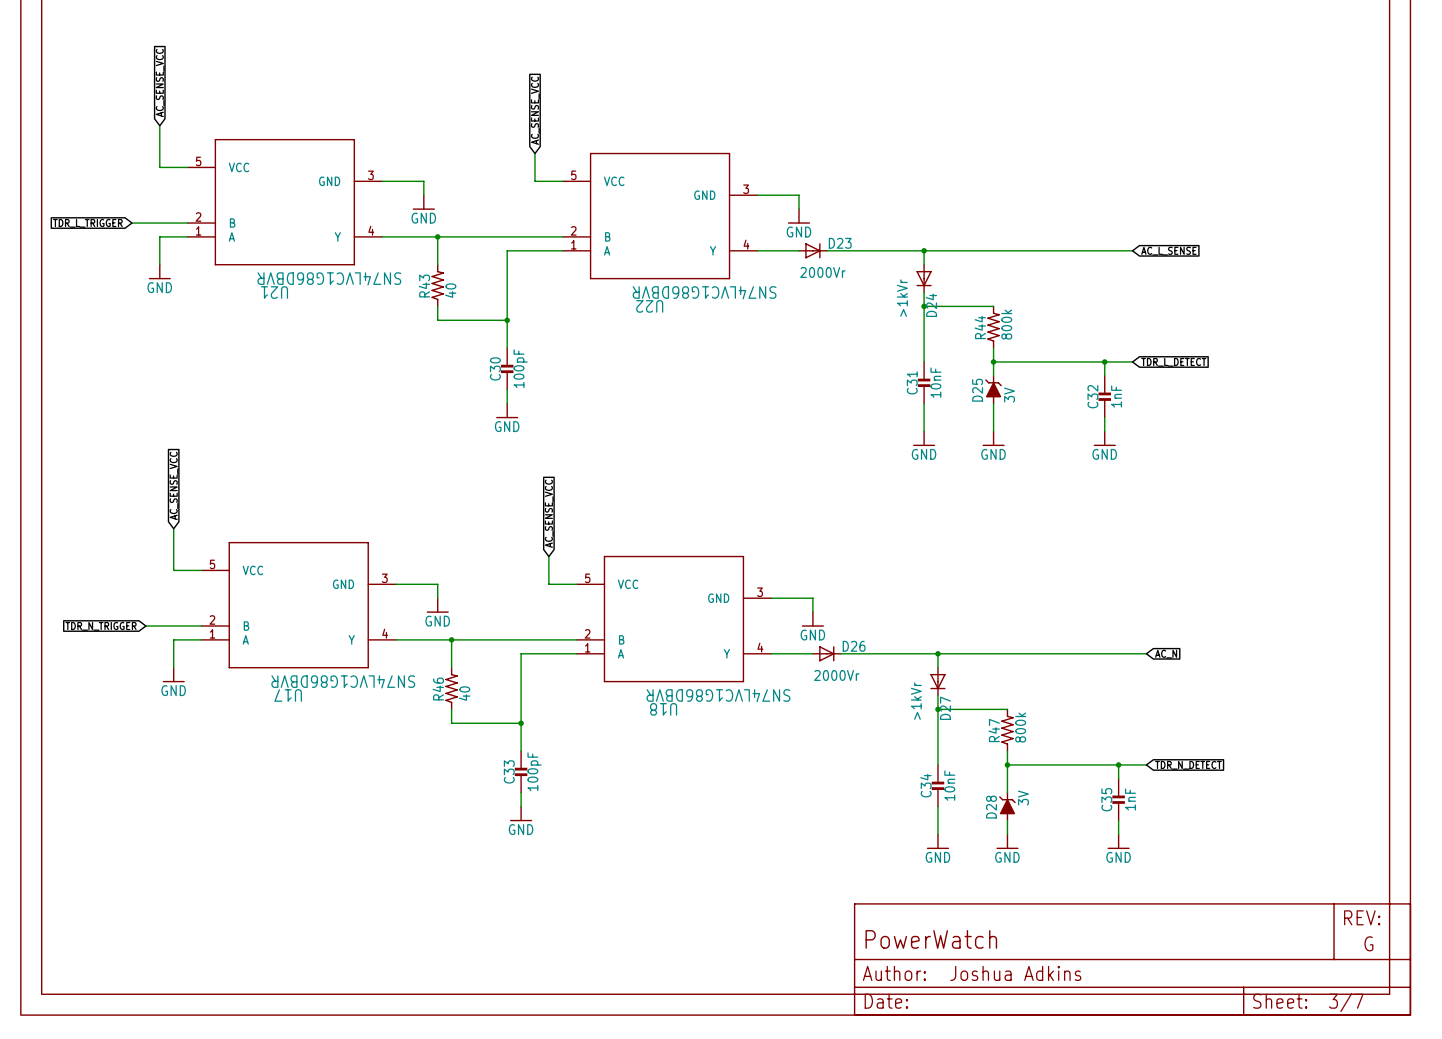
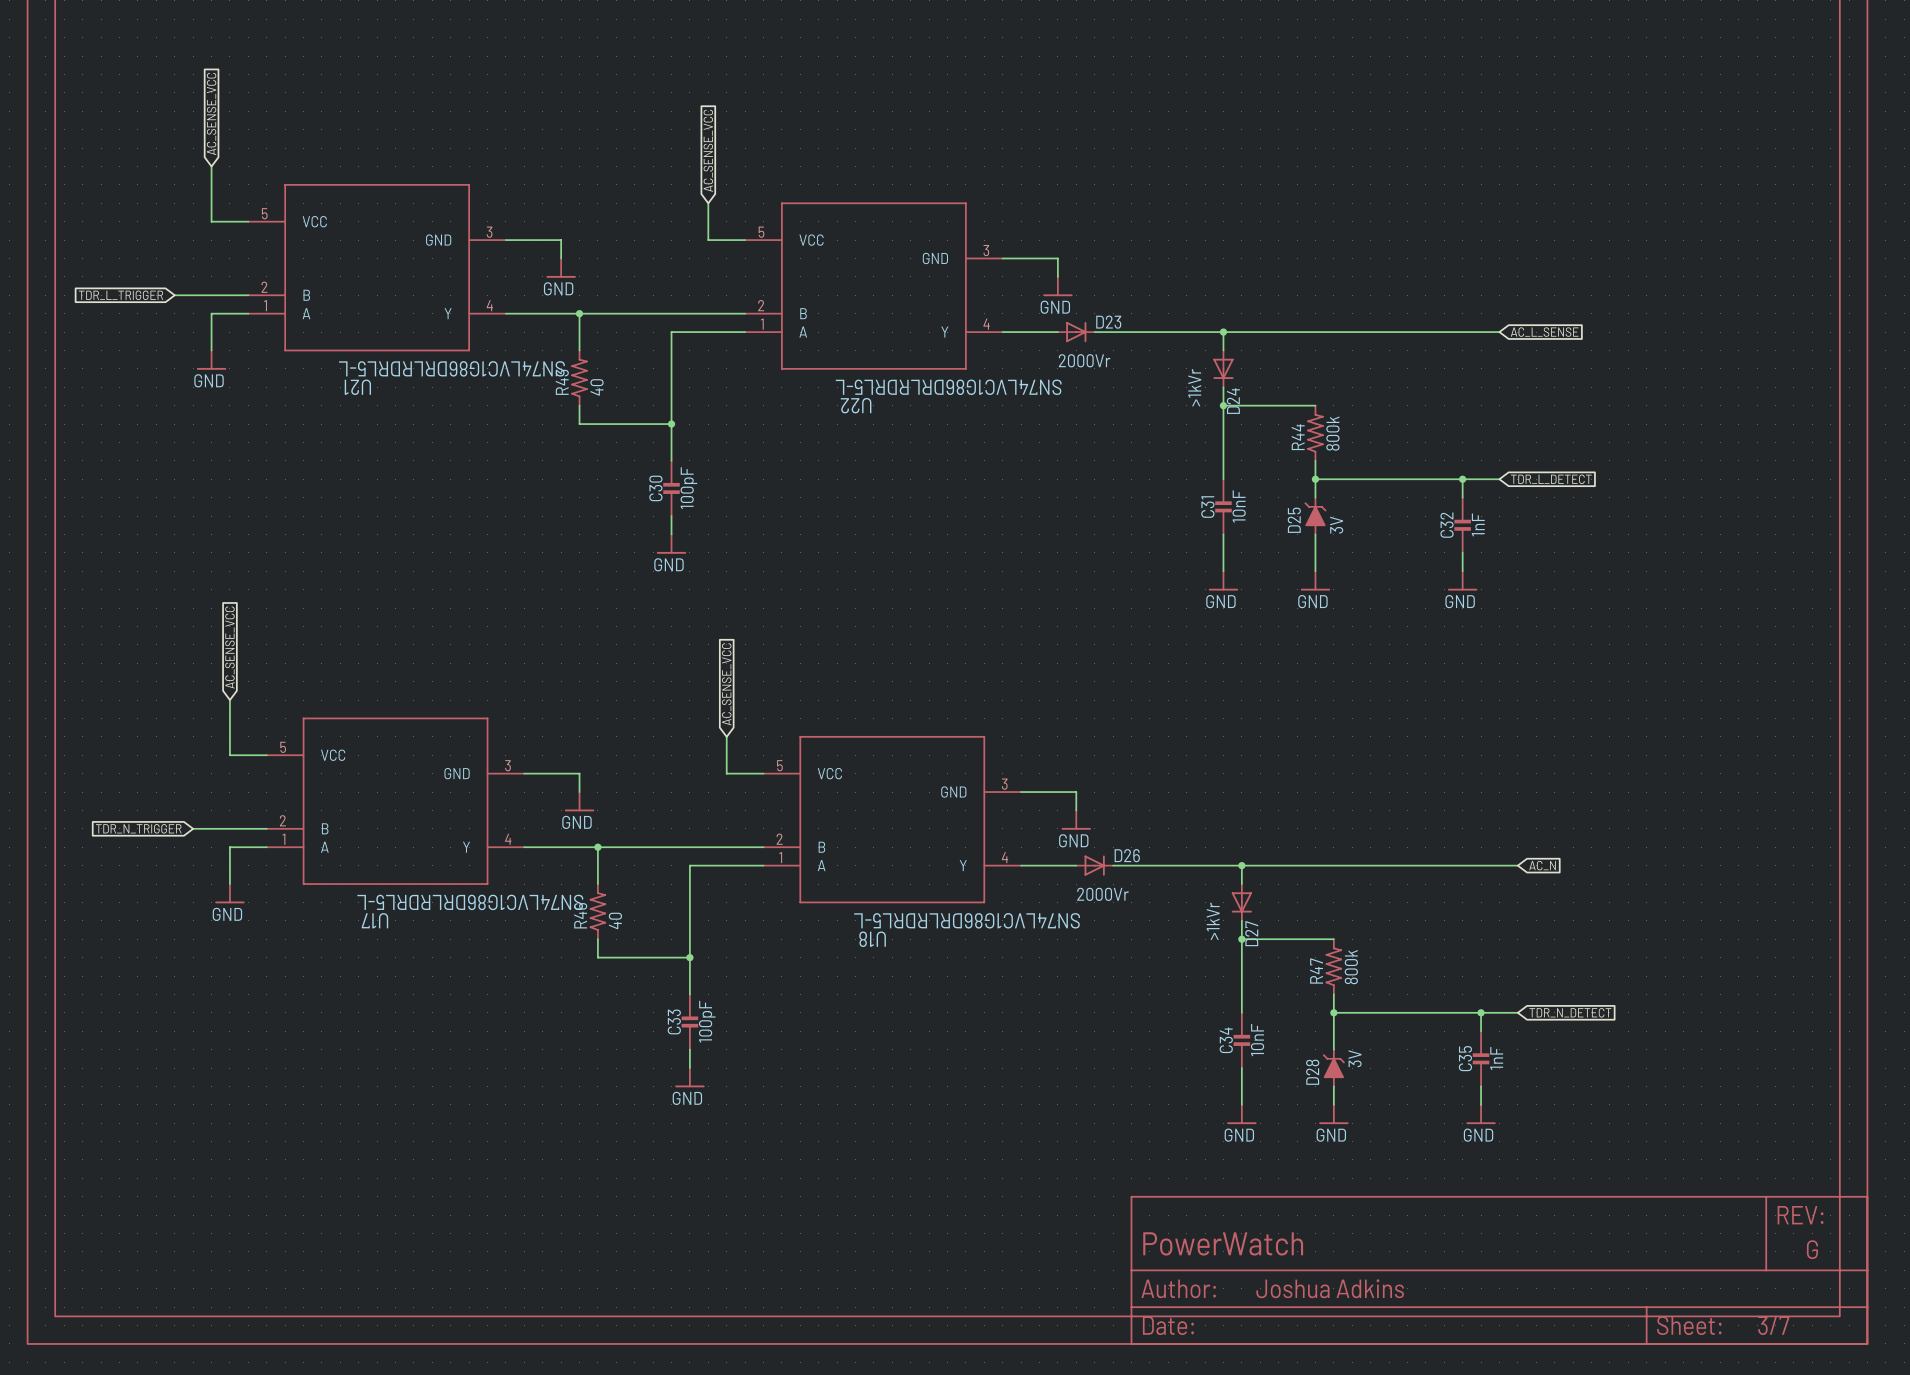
U21 value: SN74LVC1G86DBVR (329, 278) -> SN74LVC1G86DRLRDRL5-L (451, 368)
U22 value: SN74LVC1G86DBVR (704, 292) -> SN74LVC1G86DRLRDRL5-L (948, 387)
U17 value: SN74LVC1G86DBVR (343, 681) -> SN74LVC1G86DRLRDRL5-L (470, 902)
U18 value: SN74LVC1G86DBVR (718, 695) -> SN74LVC1G86DRLRDRL5-L (967, 920)

